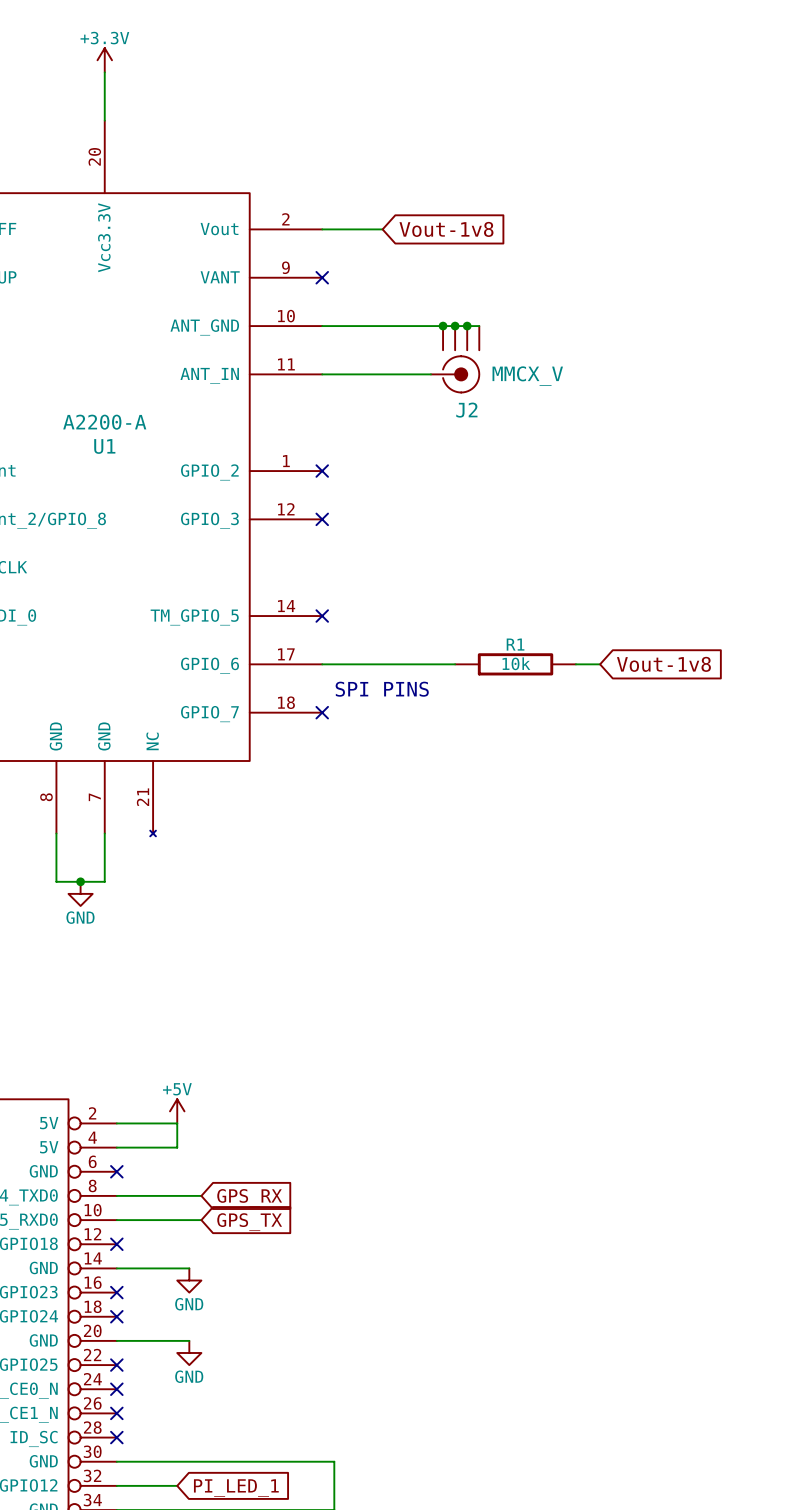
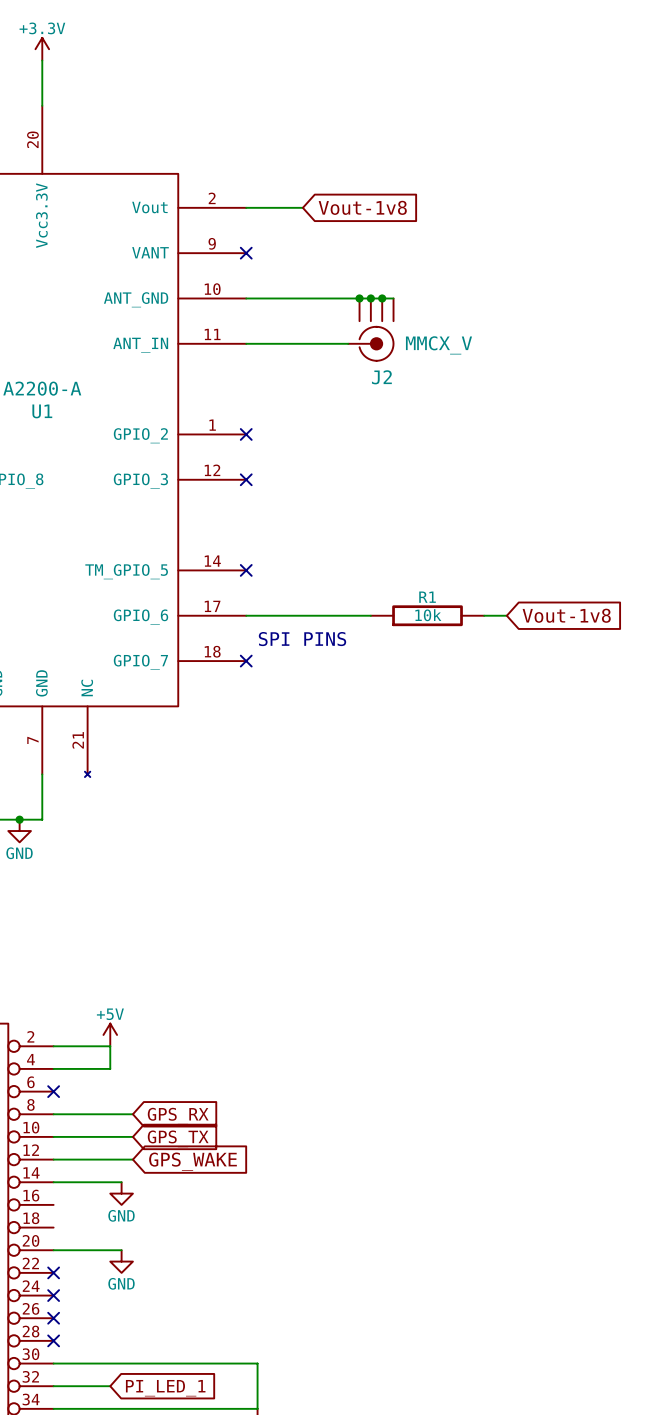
wire: none -> (53, 1159) (132, 1159)
no-connect mark: (116, 1244) -> none
global label: none -> GPS_WAKE (193, 1161)
no-connect mark: (116, 1292) -> none
no-connect mark: (116, 1316) -> none

